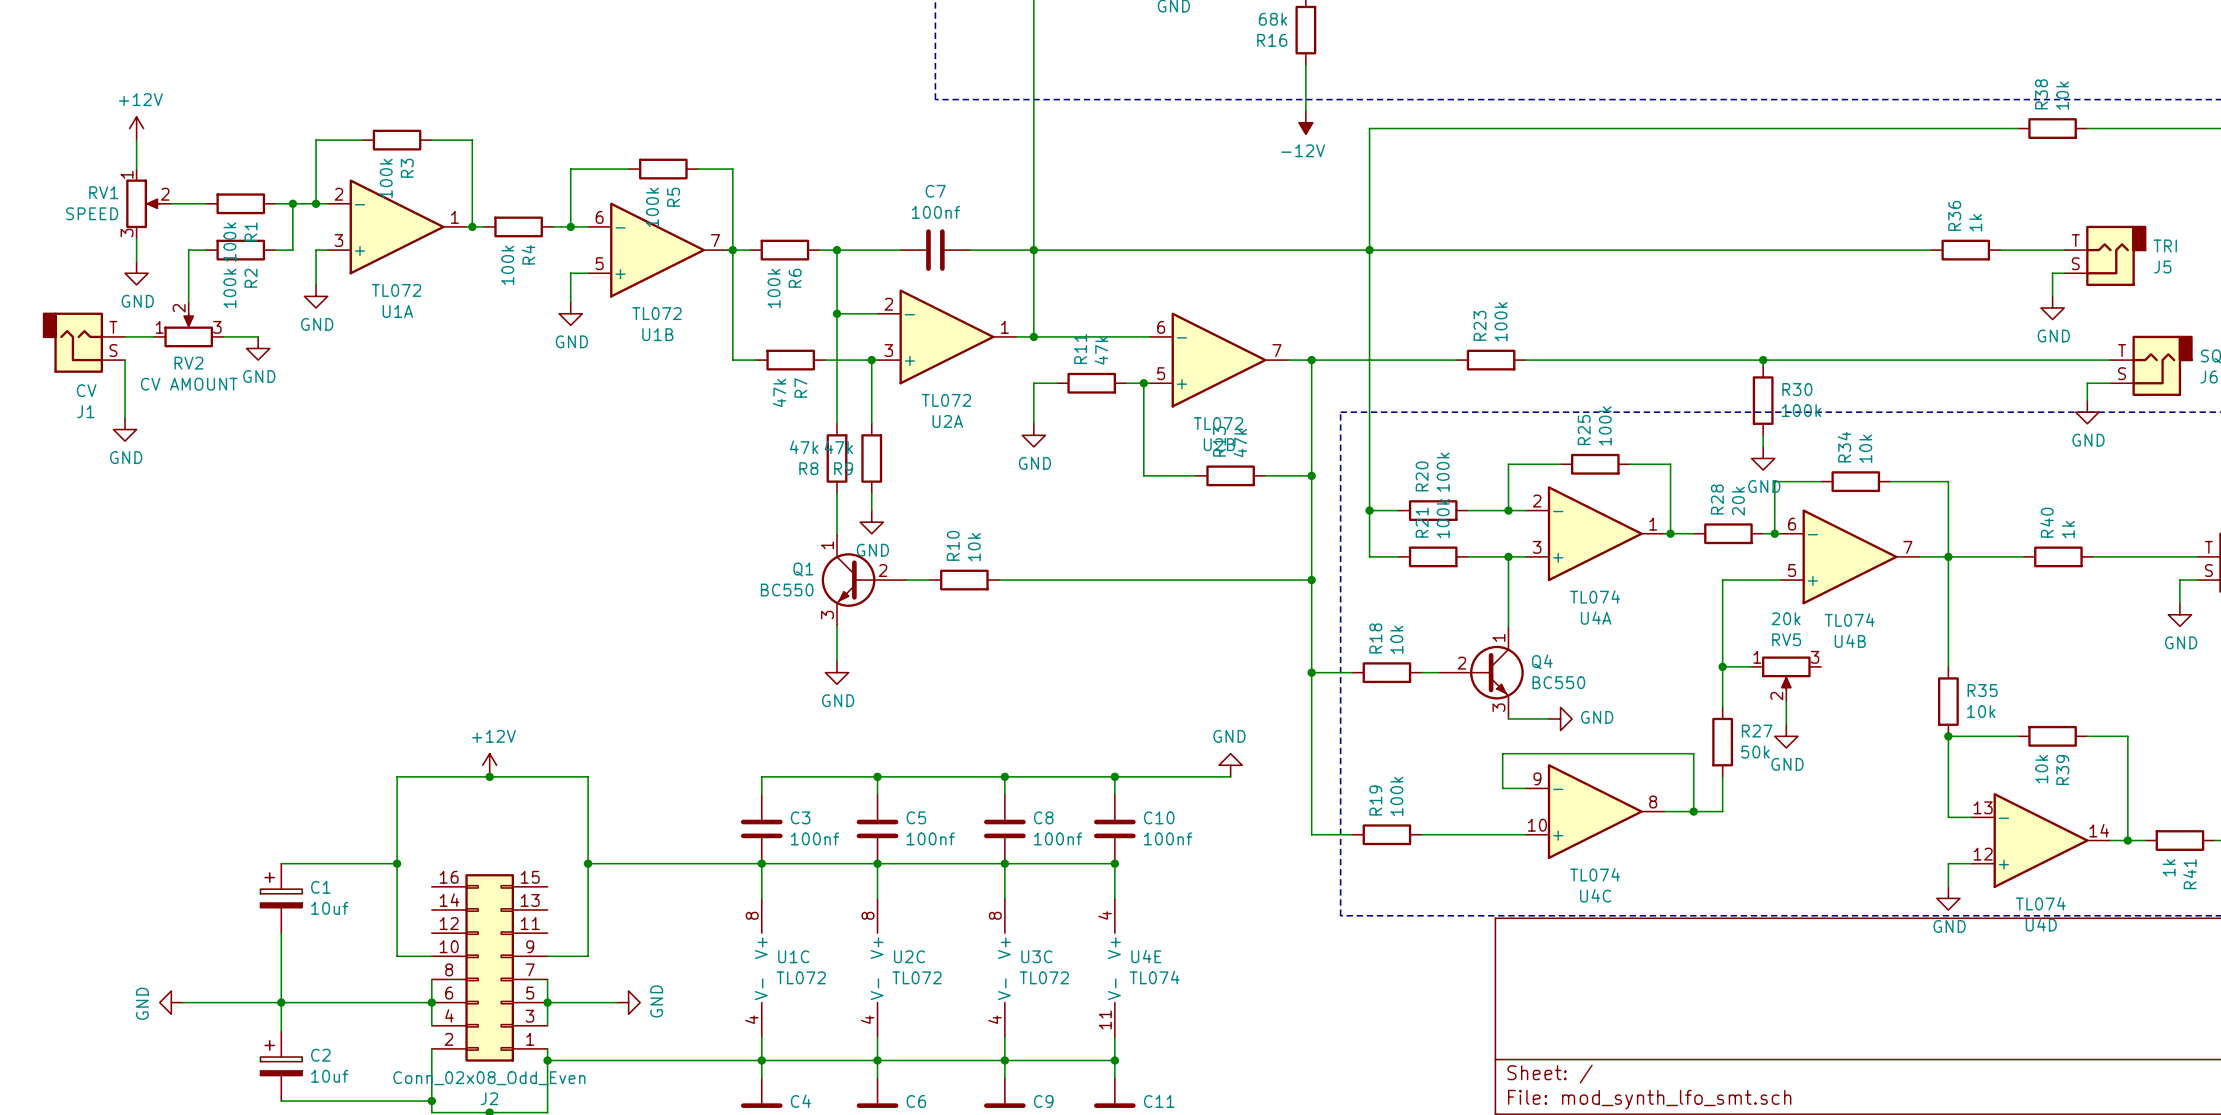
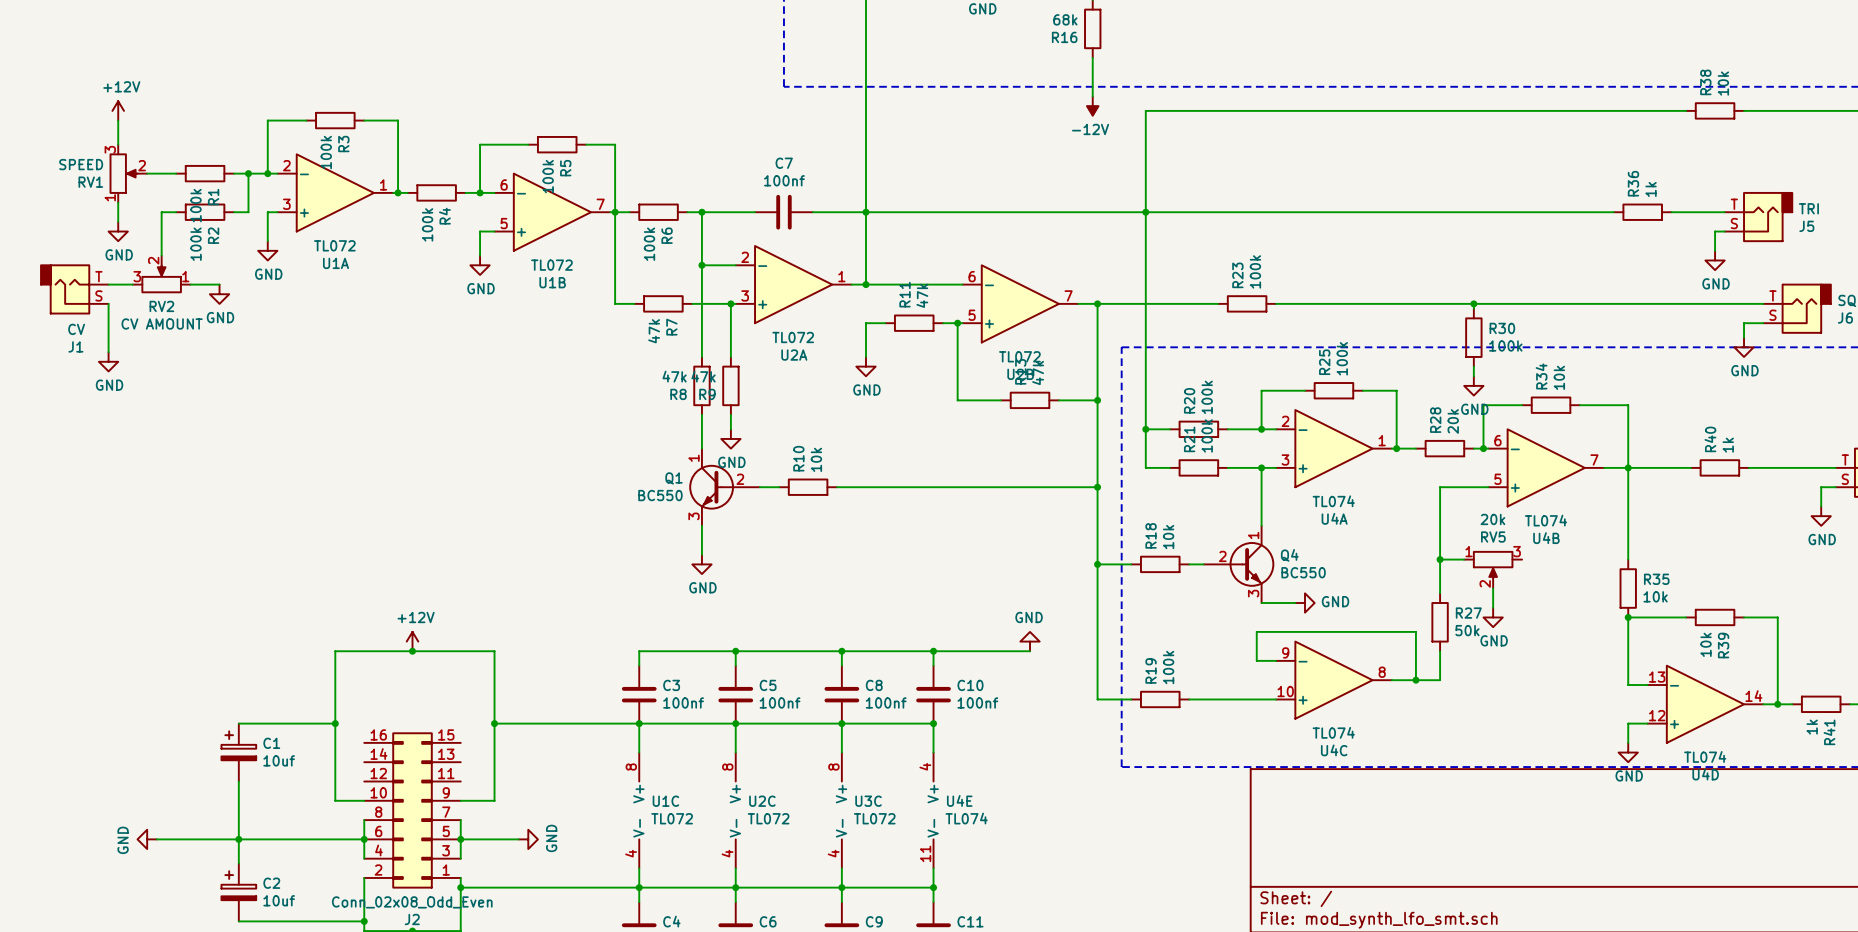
RV1 flip: as is (142, 203) -> up-down (123, 173)
RV2 flip: as is (188, 330) -> left-right (161, 279)

